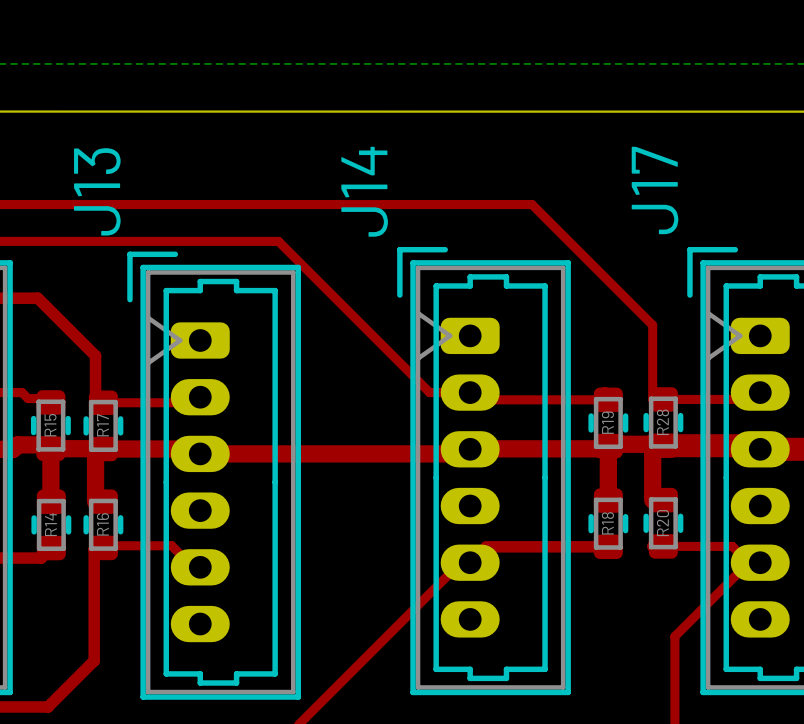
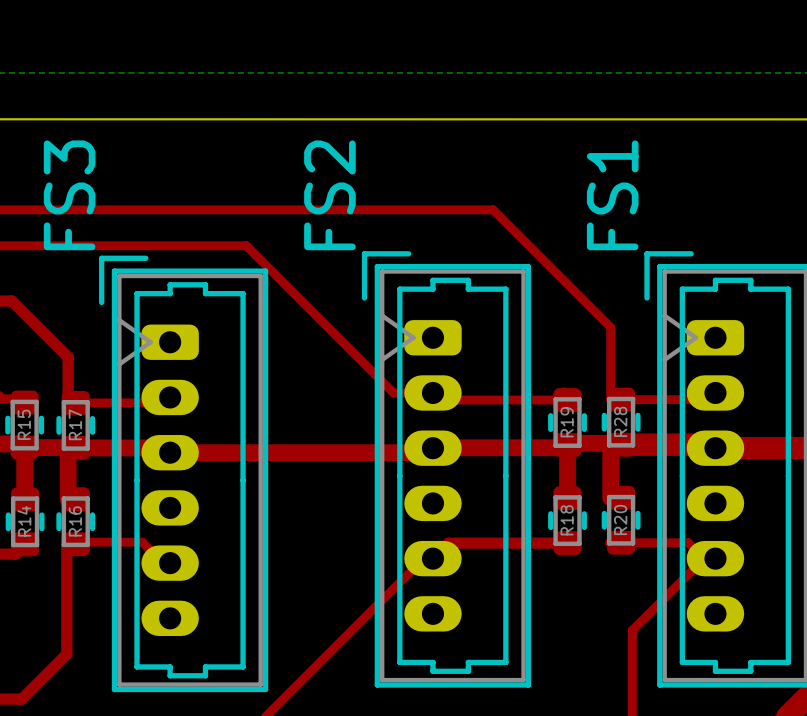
J17 name: J17 (655, 190) -> FS1 (612, 195)
J13 name: J13 (97, 191) -> FS3 (69, 195)
J14 name: J14 (364, 191) -> FS2 (329, 195)

